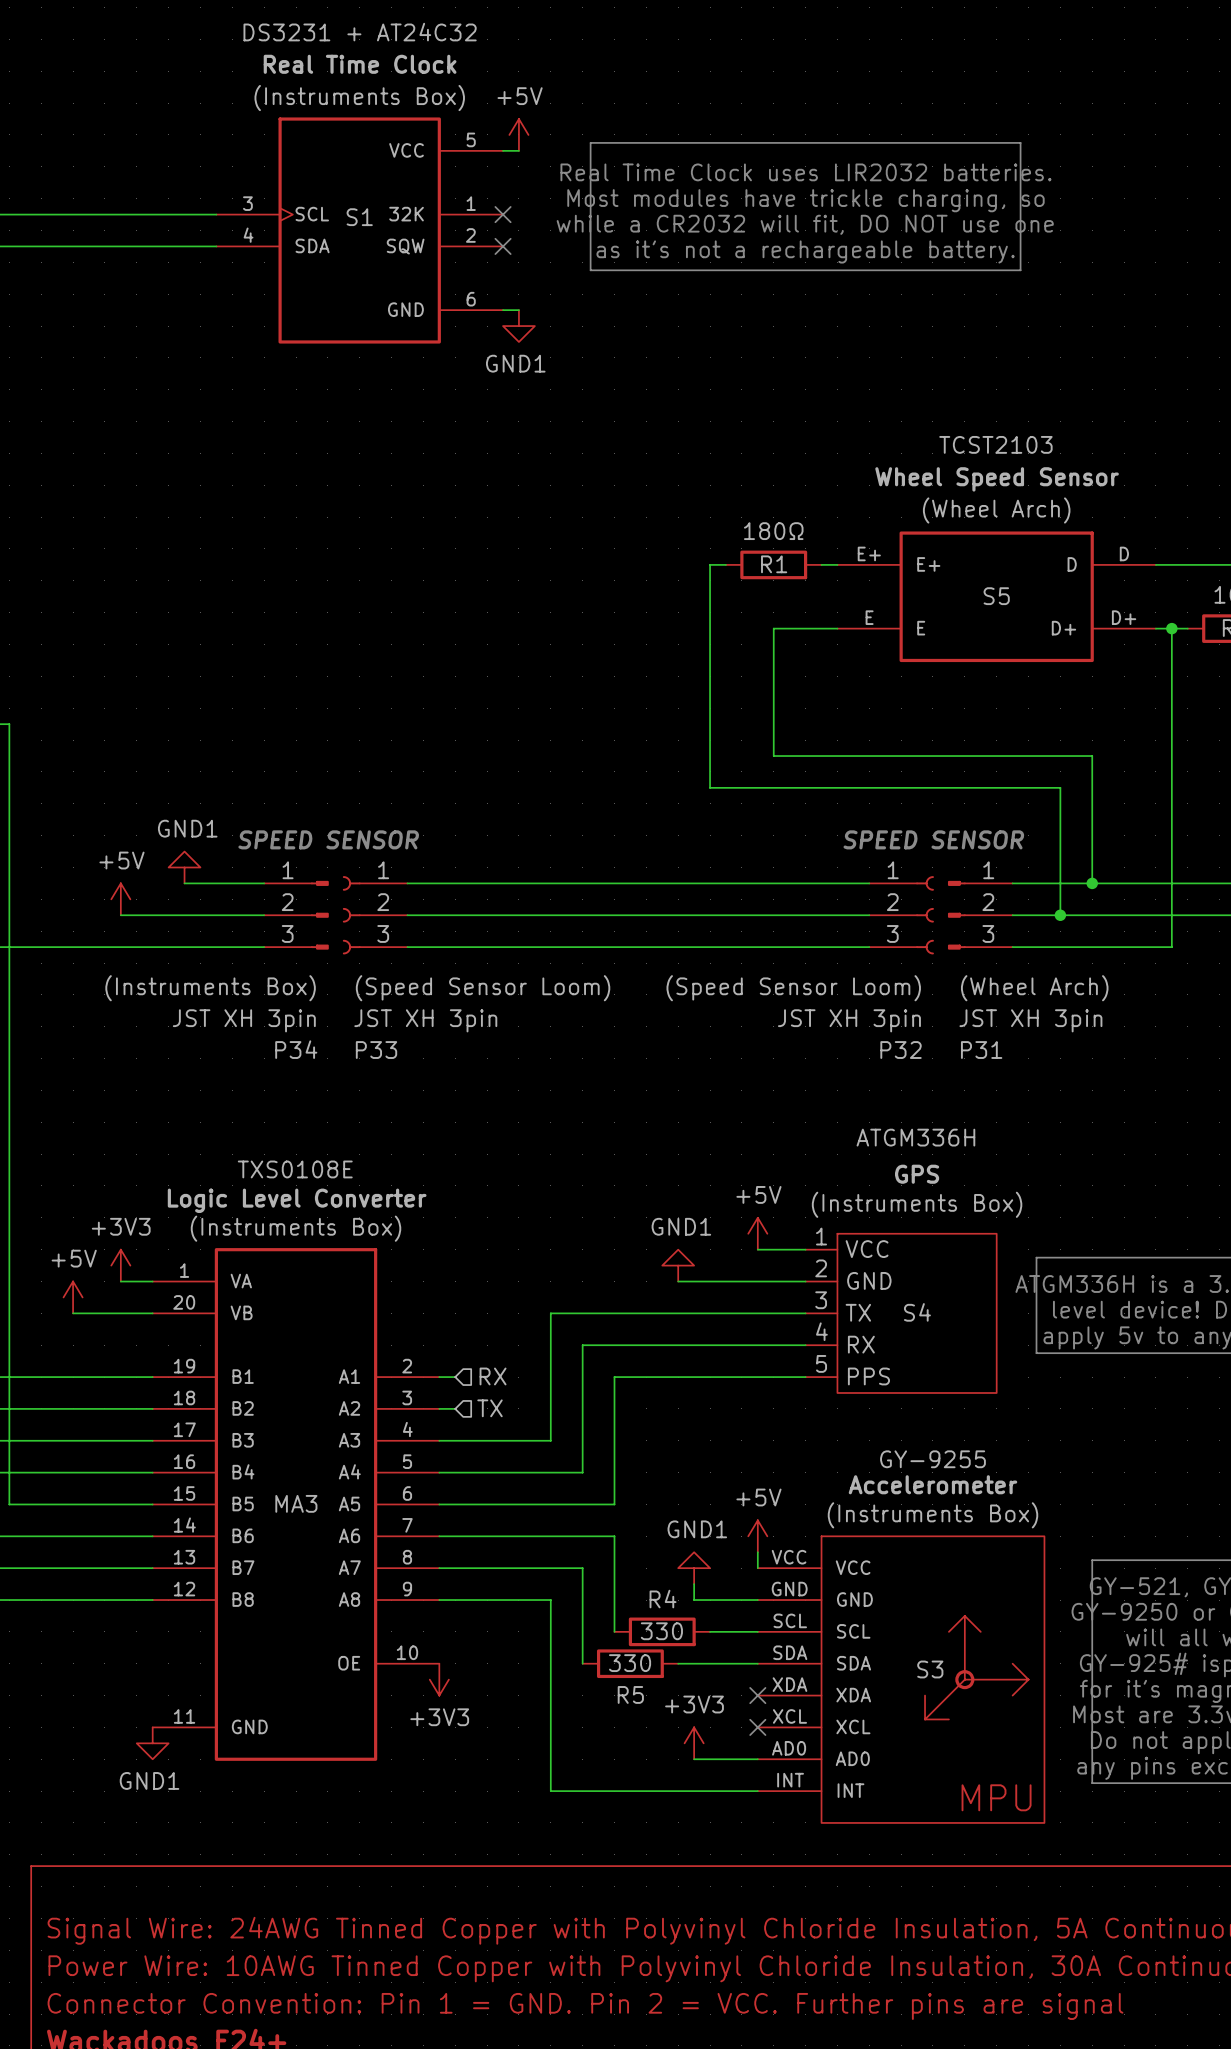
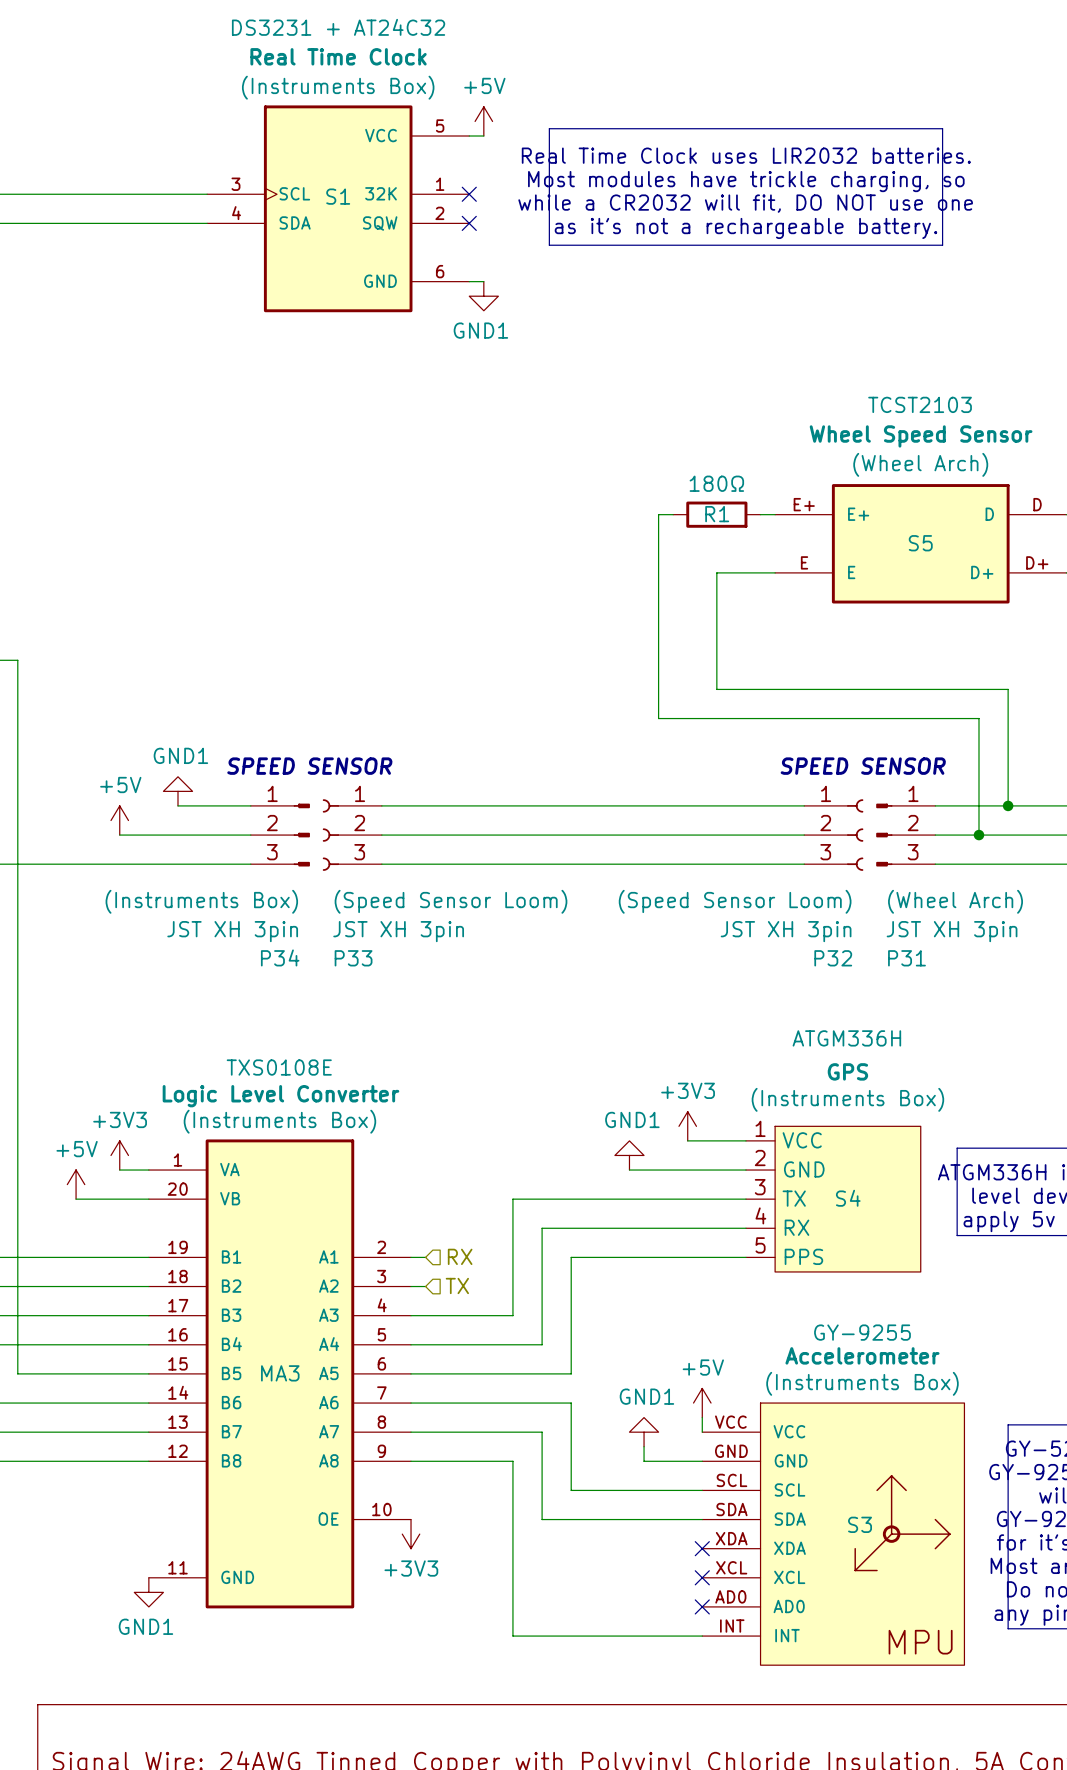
power symbol: none -> +3V3 (687, 1126)
power symbol: +5V (757, 1233) -> none
wire: none -> (687, 1140) (702, 1140)
wire: none -> (571, 1490) (658, 1490)
R4: 330 (662, 1631) -> none
wire: none -> (542, 1519) (629, 1519)
R5: 330 (630, 1663) -> none
power symbol: +3V3 (694, 1743) -> none
wire: (694, 1759) (757, 1759) -> none
no-connect mark: none -> (702, 1606)

